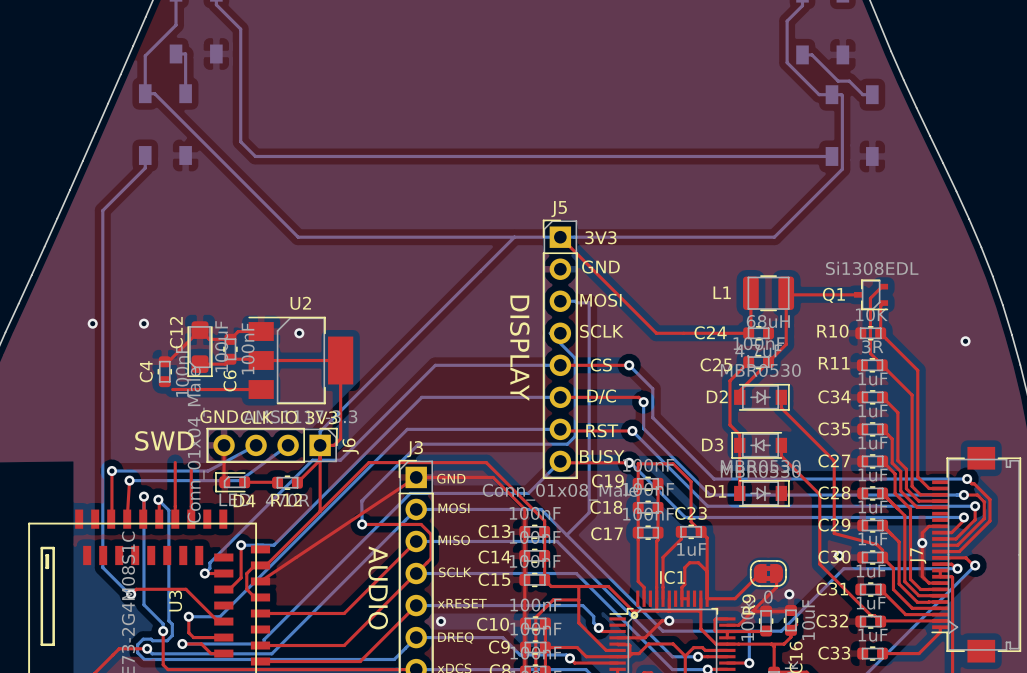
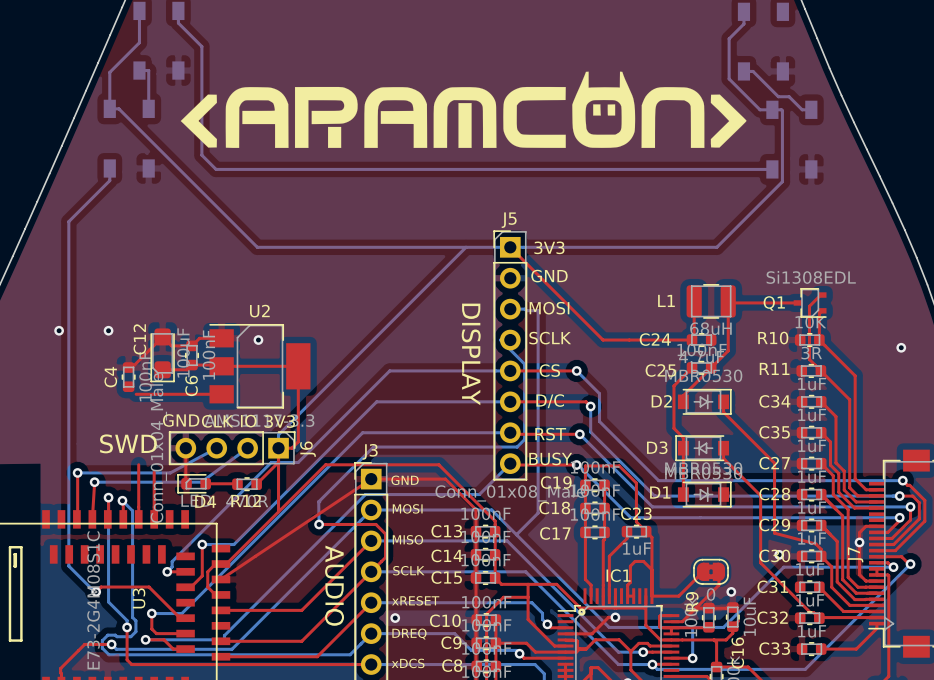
drawing: none -> [180, 71, 747, 148]

